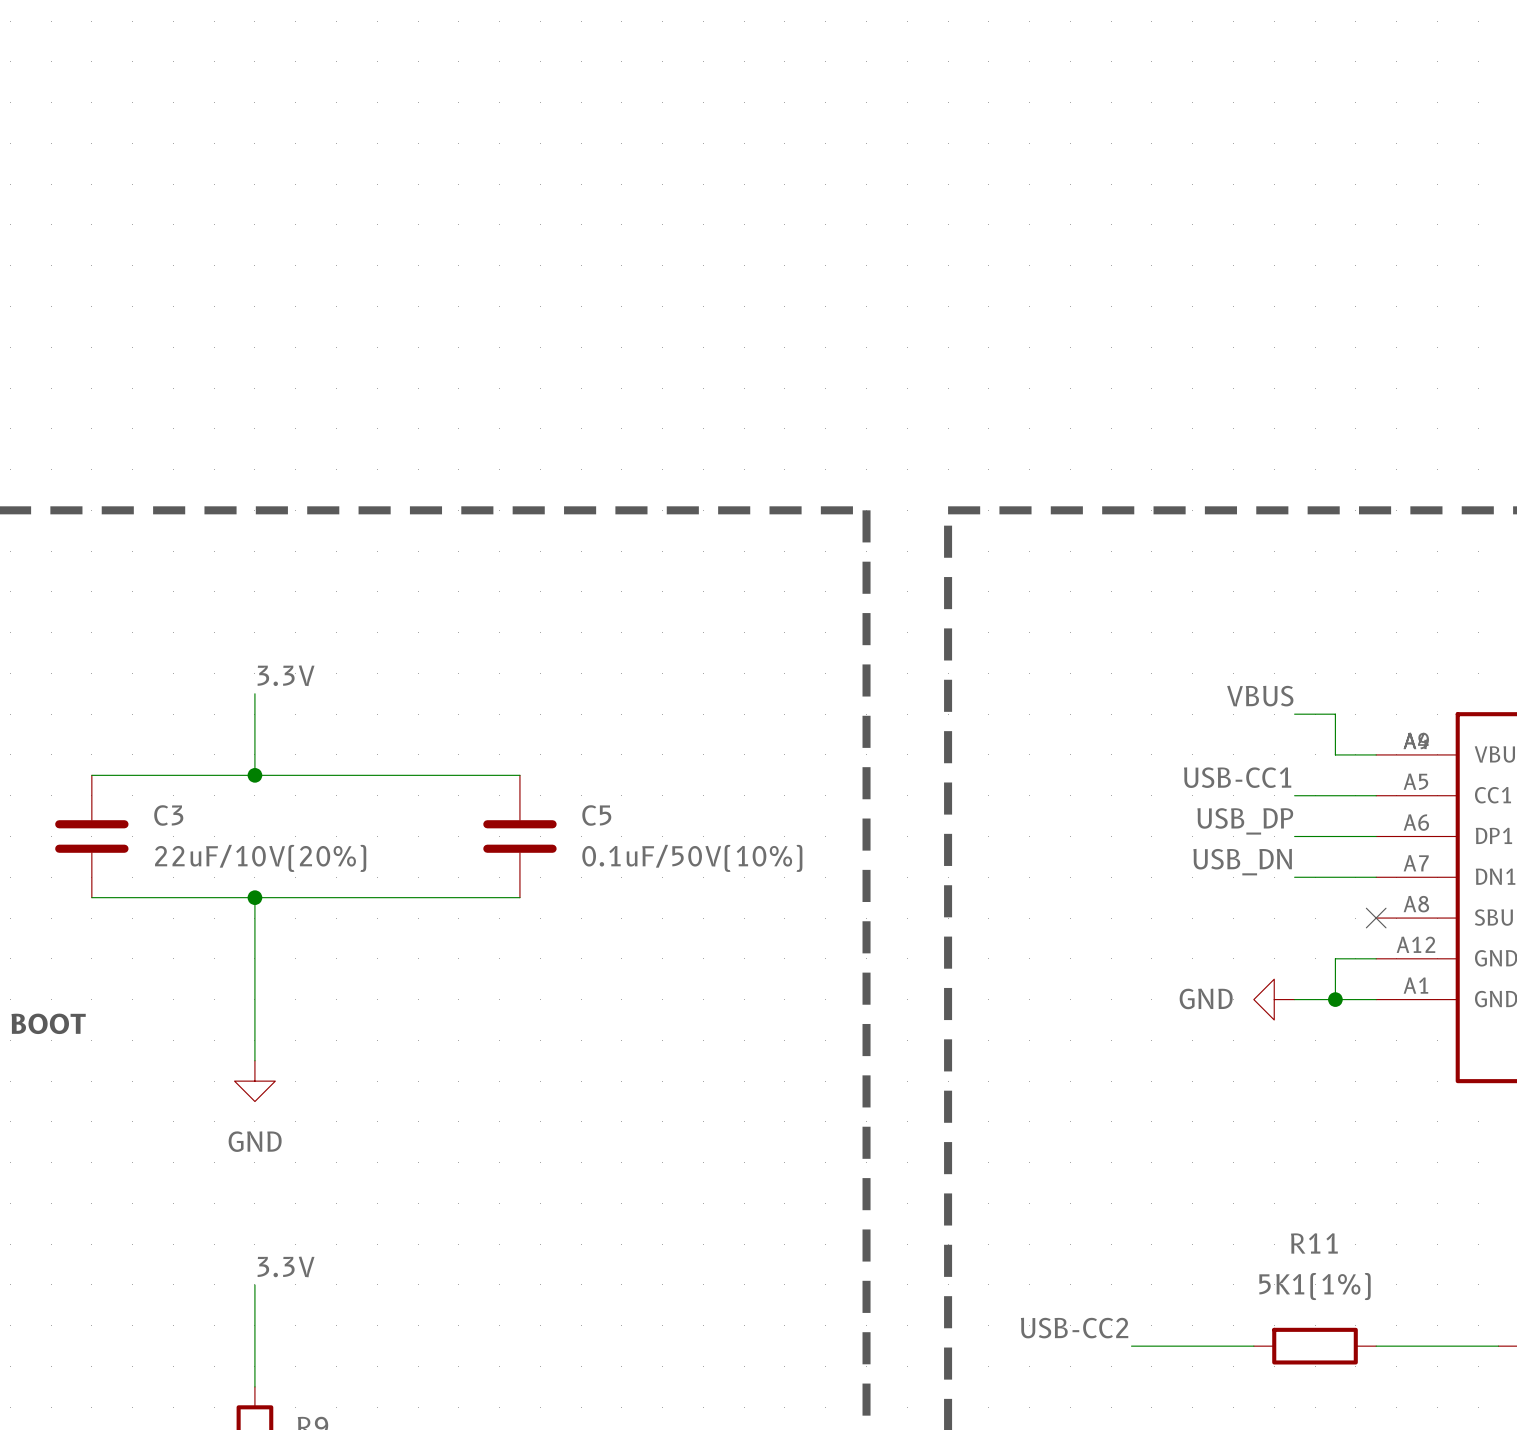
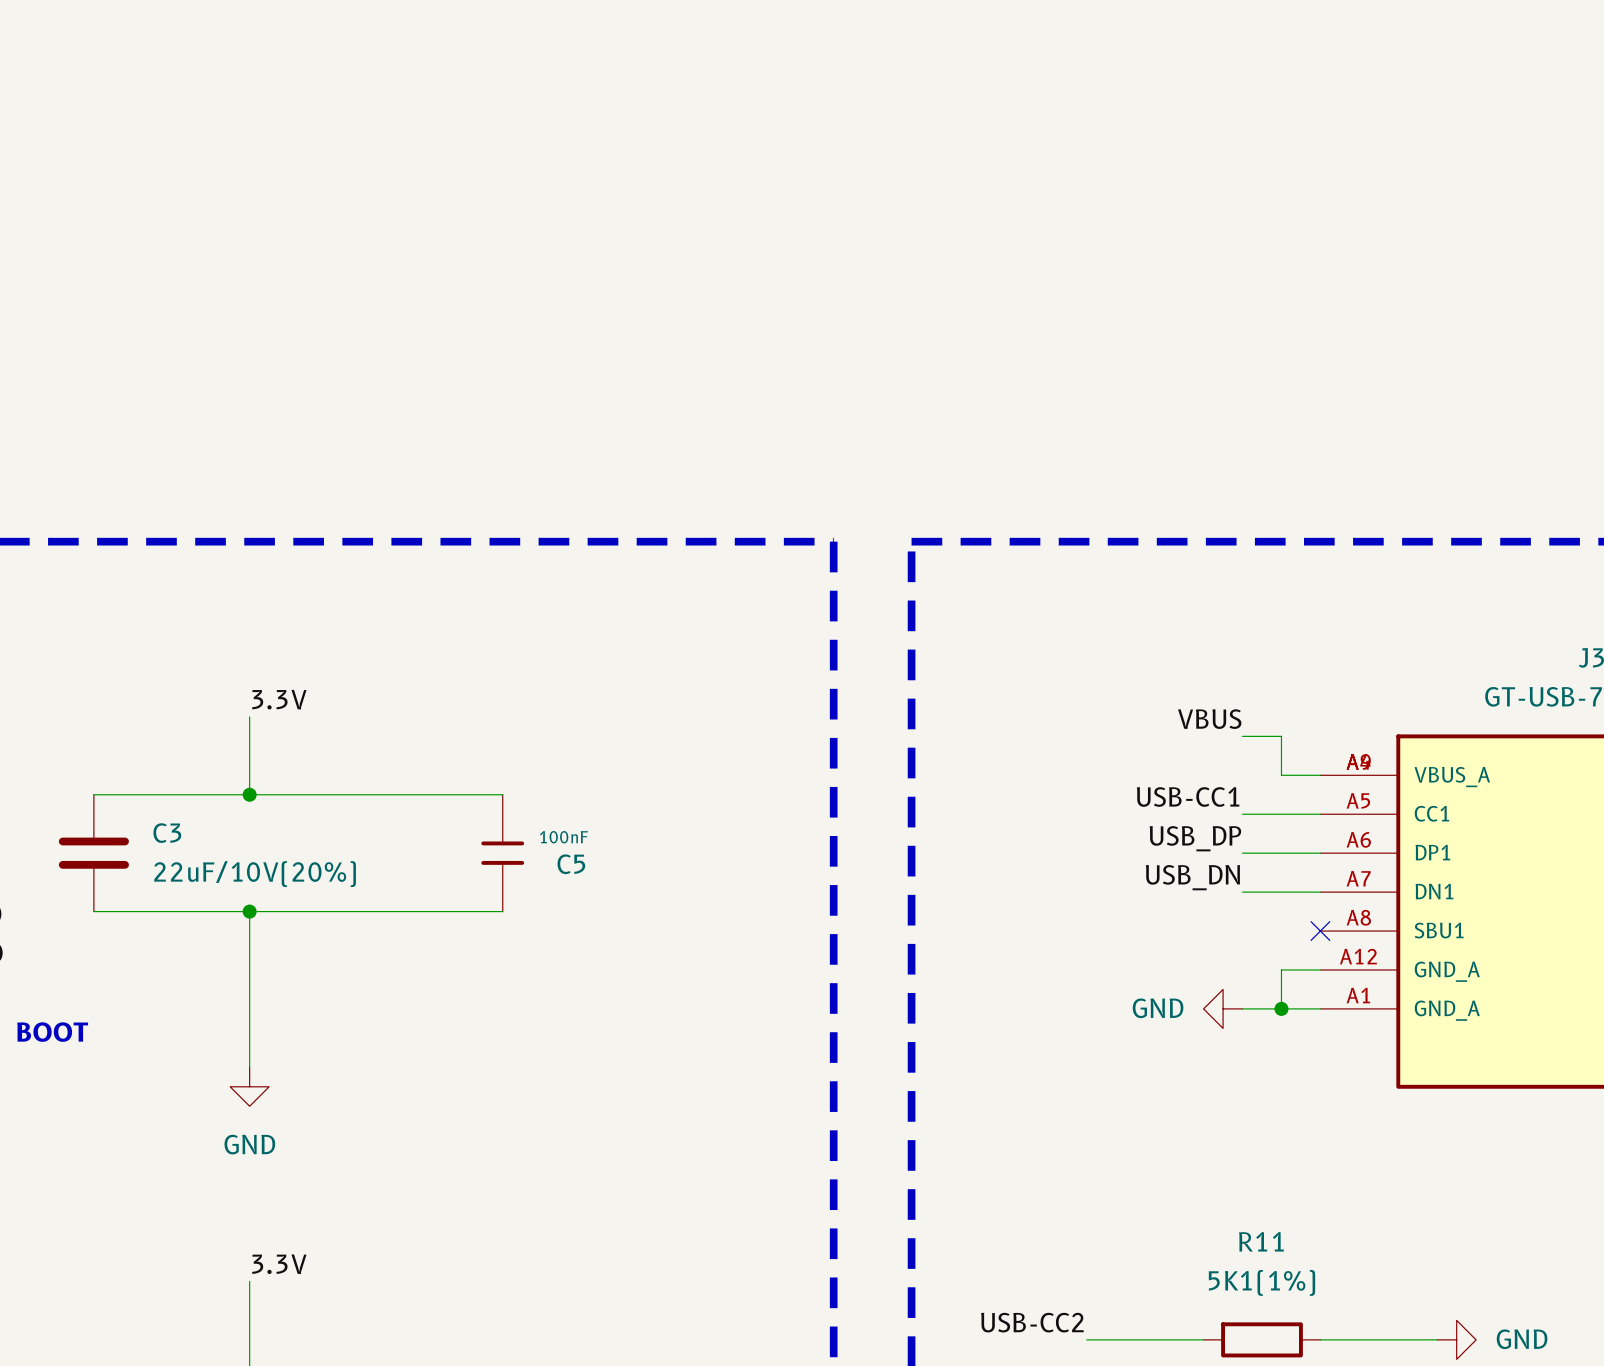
C5 symbol: [483, 775, 557, 898] -> [481, 794, 525, 912]
C5 name position: C5 (596, 815) -> C5 (571, 864)
C5 value: 0.1uF/50V(10%) (692, 858) -> 100nF (563, 837)

